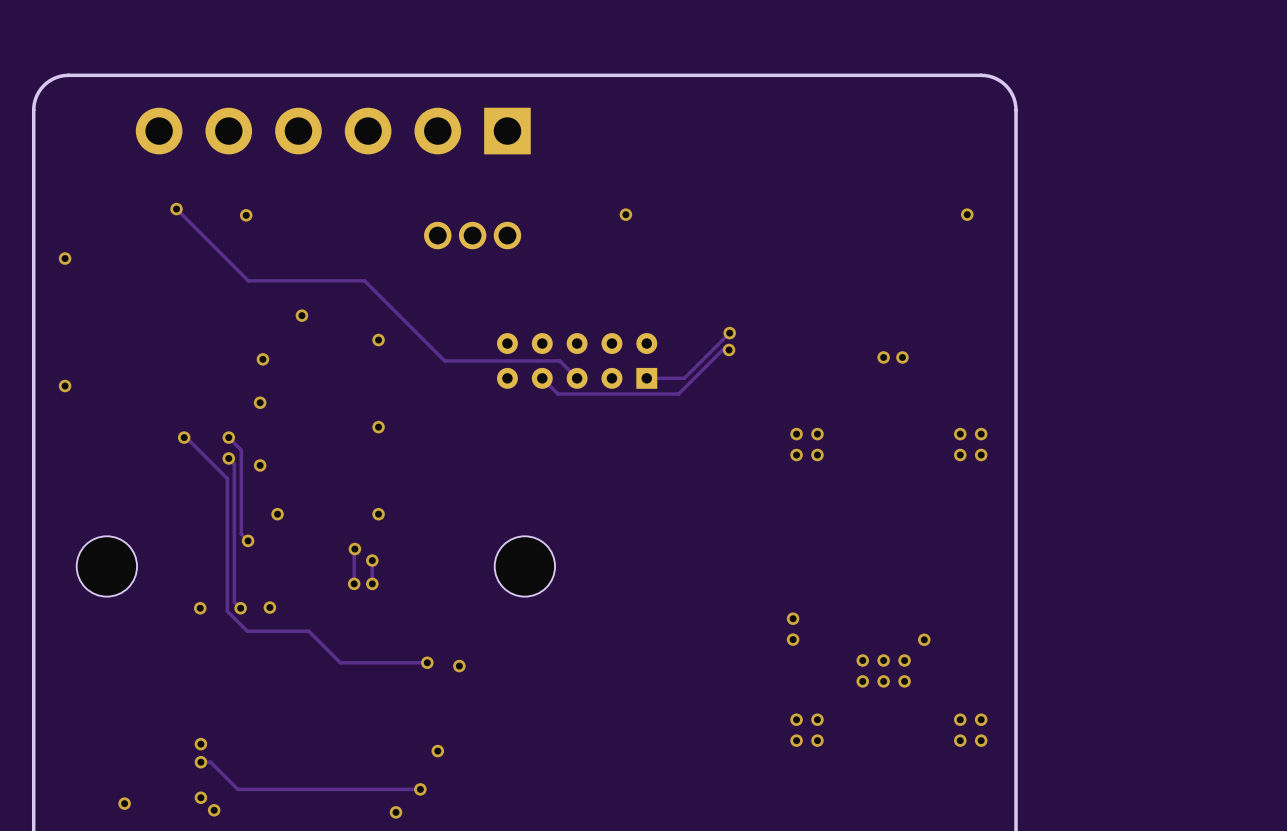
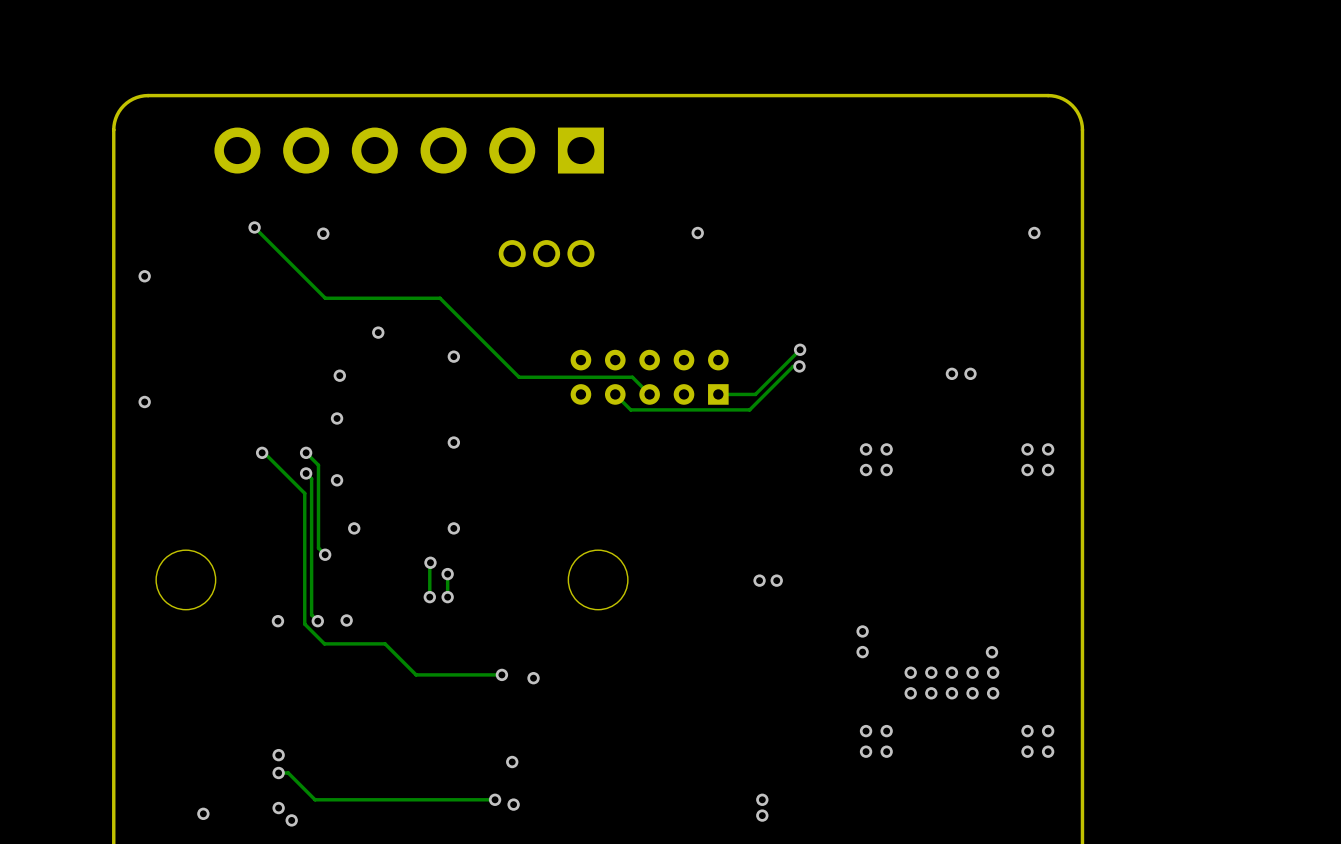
via: none -> (759, 580)
via: none -> (776, 580)
via: none -> (910, 672)
via: none -> (993, 672)
via: none -> (910, 693)
via: none -> (993, 693)
via: none -> (762, 799)
via: none -> (762, 815)
via position: (395, 812) -> (513, 804)

